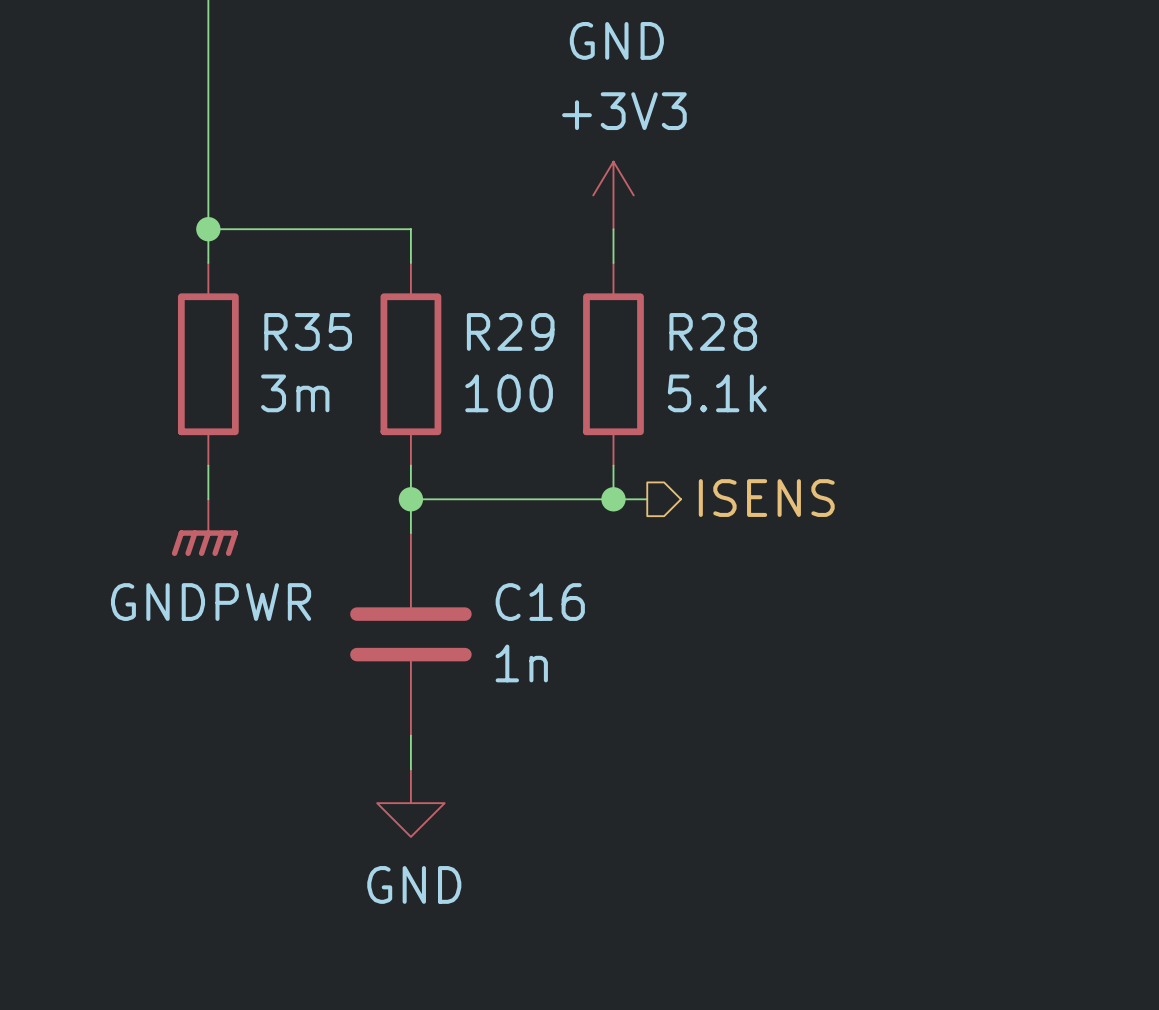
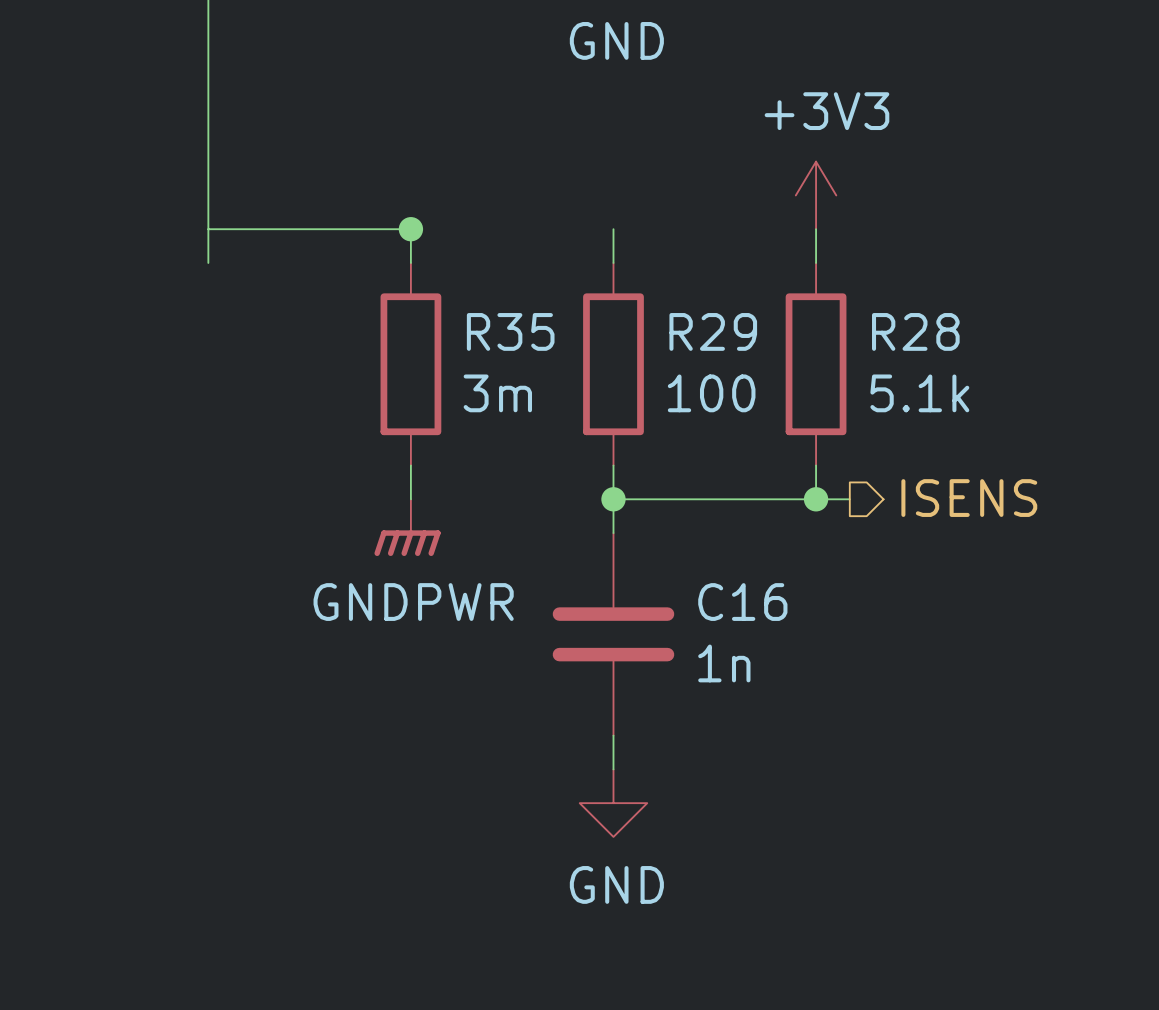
power symbol position: +3V3 (613, 195) -> +3V3 (816, 195)
junction: (208, 229) -> none
junction: none -> (410, 229)
wire: none -> (816, 229) (816, 262)
R29 name: R29 (510, 331) -> R35 (510, 331)
R28 name: R28 (713, 331) -> R29 (713, 331)
R35: 3m (208, 364) -> none
R28: none -> 5.1k (816, 364)
R29 value: 100 (509, 393) -> 3m (497, 393)
R28 value: 5.1k (717, 393) -> 100 (711, 393)
wire: (208, 465) (208, 499) -> (816, 465) (816, 499)
hierarchical label position: ISENS (766, 498) -> ISENS (969, 498)
junction: (410, 499) -> none
wire: (613, 499) (410, 499) (410, 533) -> (613, 499) (613, 533)
wire: none -> (647, 499) (849, 499)
junction: none -> (816, 499)
power symbol position: GNDPWR (204, 527) -> GNDPWR (407, 527)
C16 position: (410, 634) -> (613, 634)
wire: (410, 735) (410, 769) -> (613, 735) (613, 769)
power symbol position: GND (410, 803) -> GND (613, 803)

